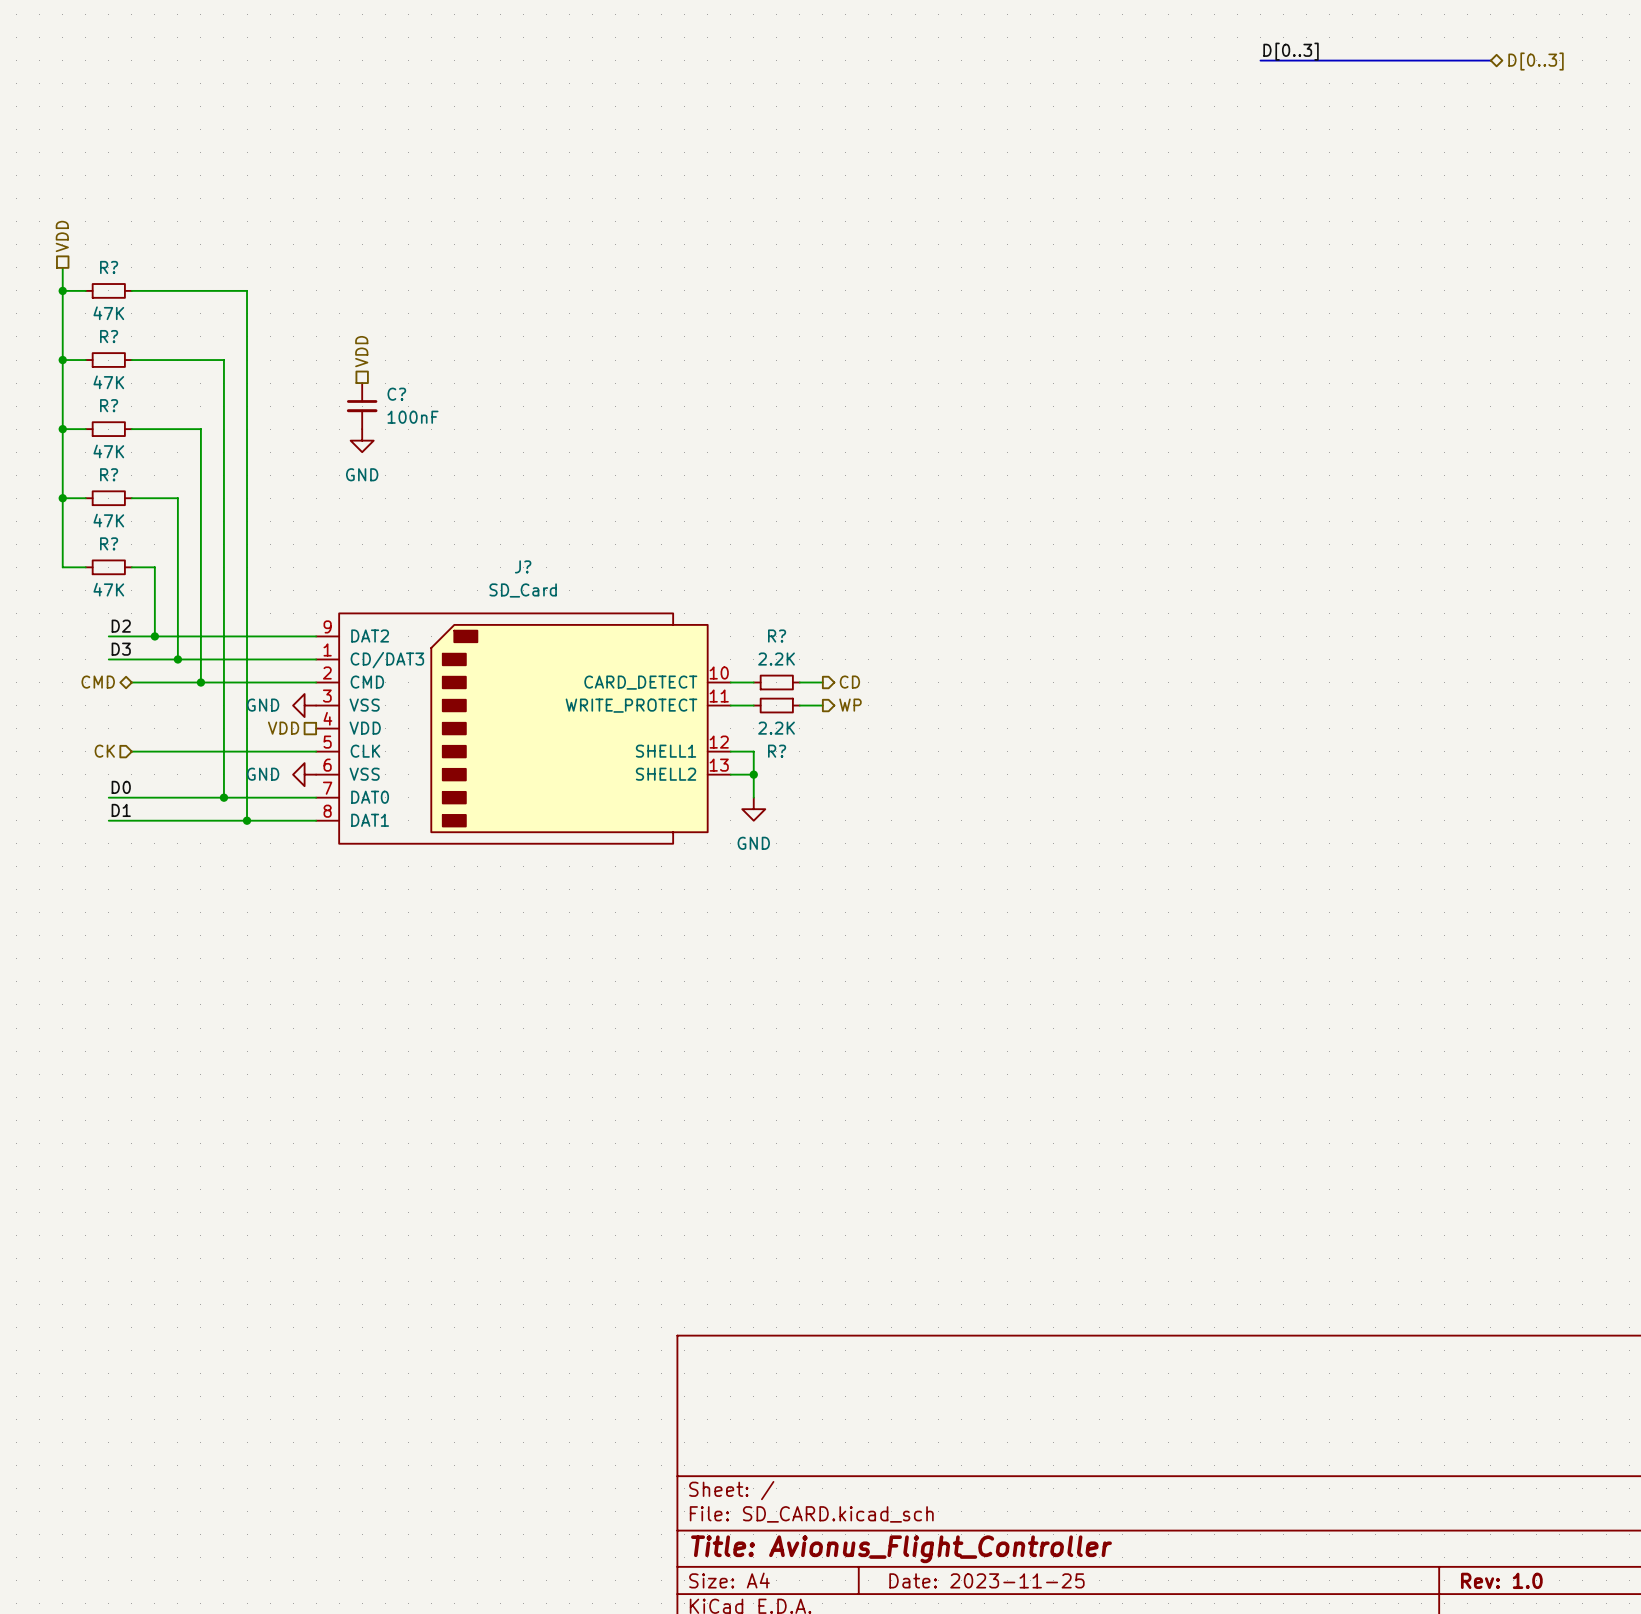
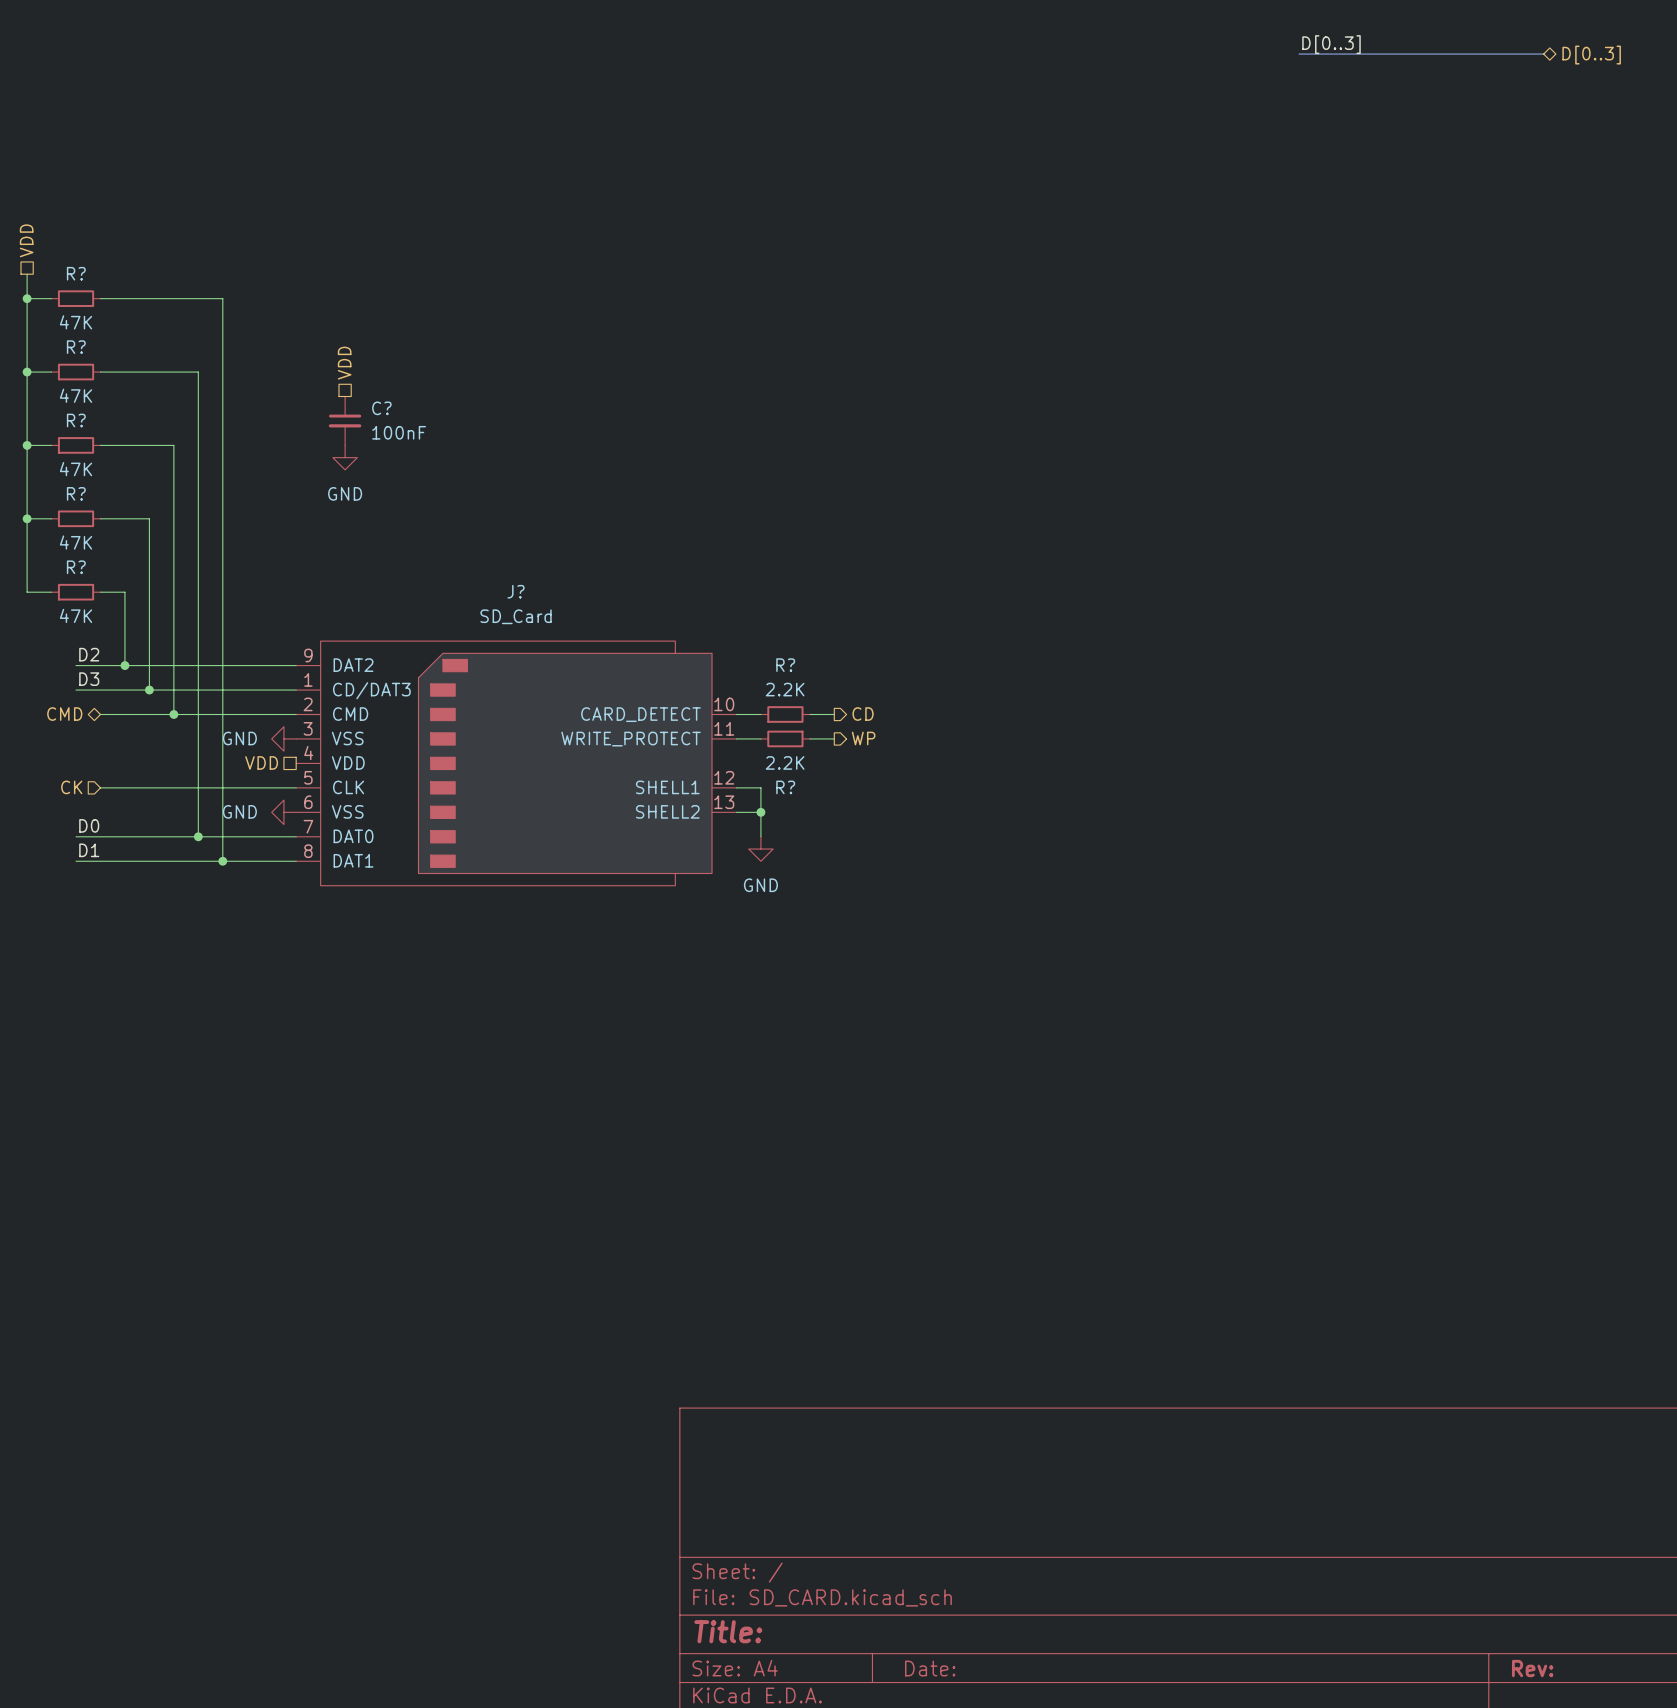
title block: Title: Avionus_Flight_Controller (901, 1549) -> Title: (728, 1631)
title block: Date: 2023-11-25 (986, 1580) -> Date: (930, 1668)
title block: Rev: 1.0 (1501, 1580) -> Rev: (1532, 1668)

